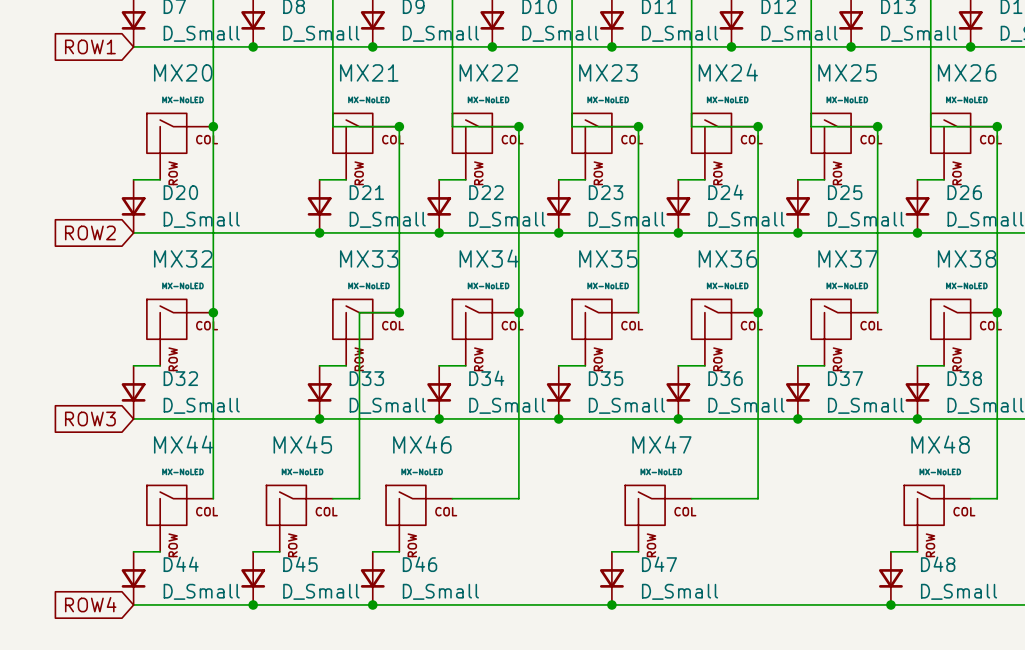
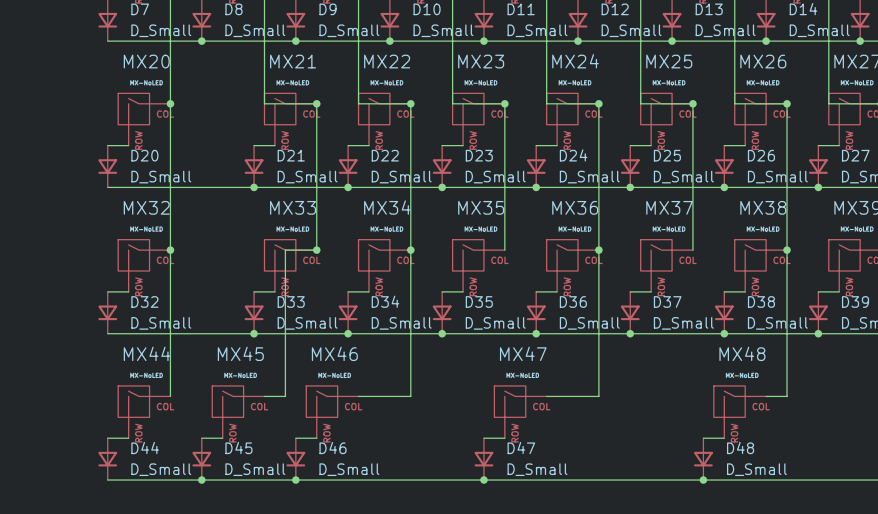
global label: ROW1 (90, 46) -> none
global label: ROW2 (90, 232) -> none
global label: ROW3 (90, 418) -> none
global label: ROW4 (90, 604) -> none

